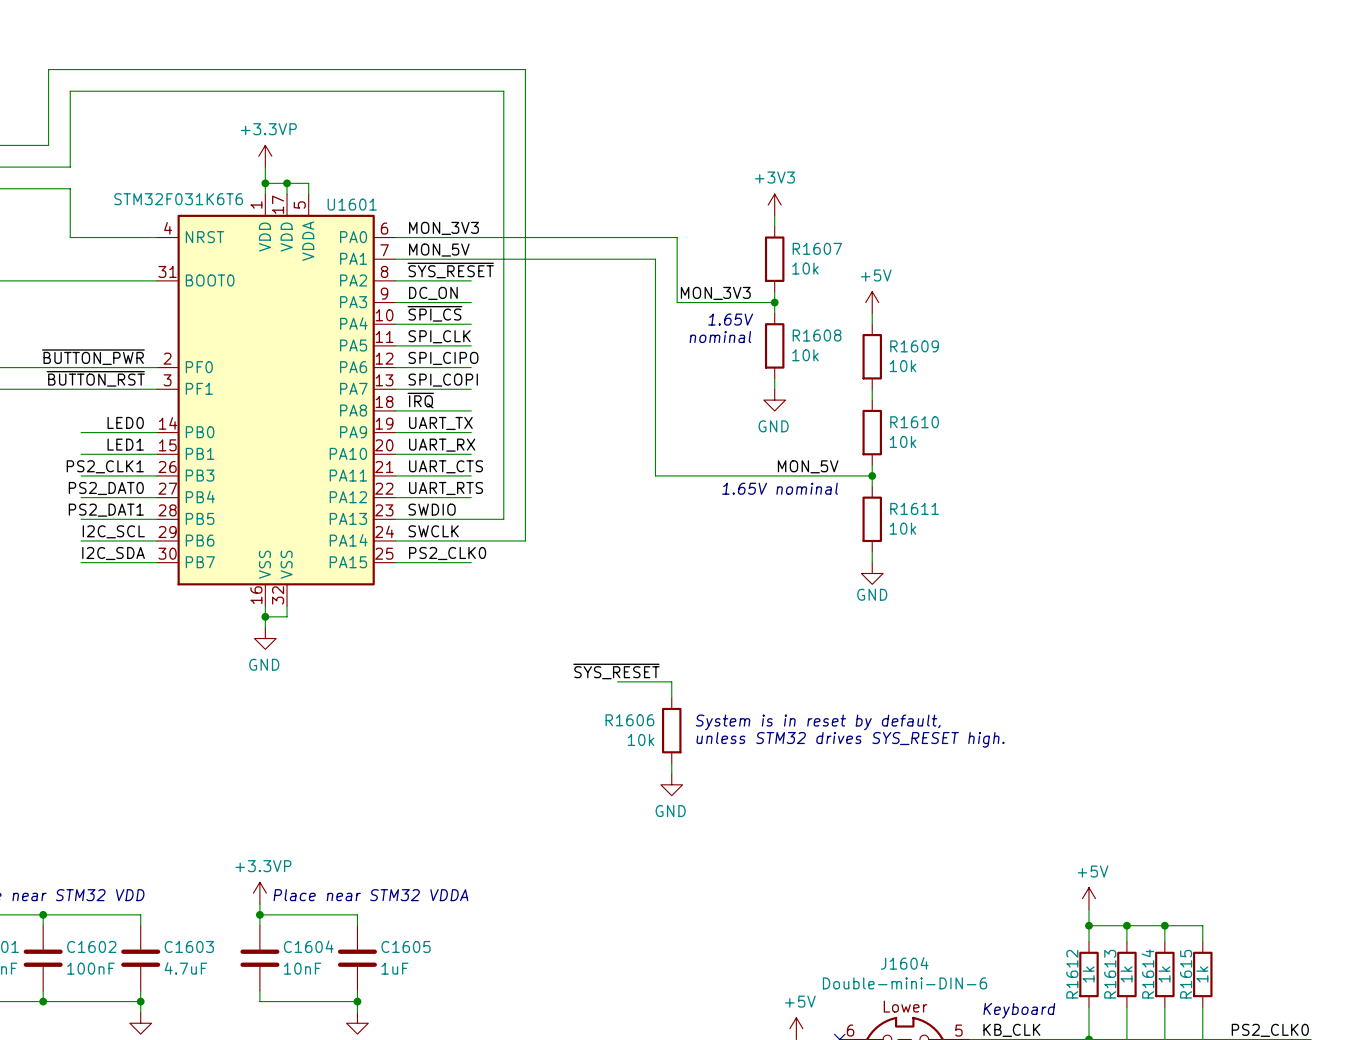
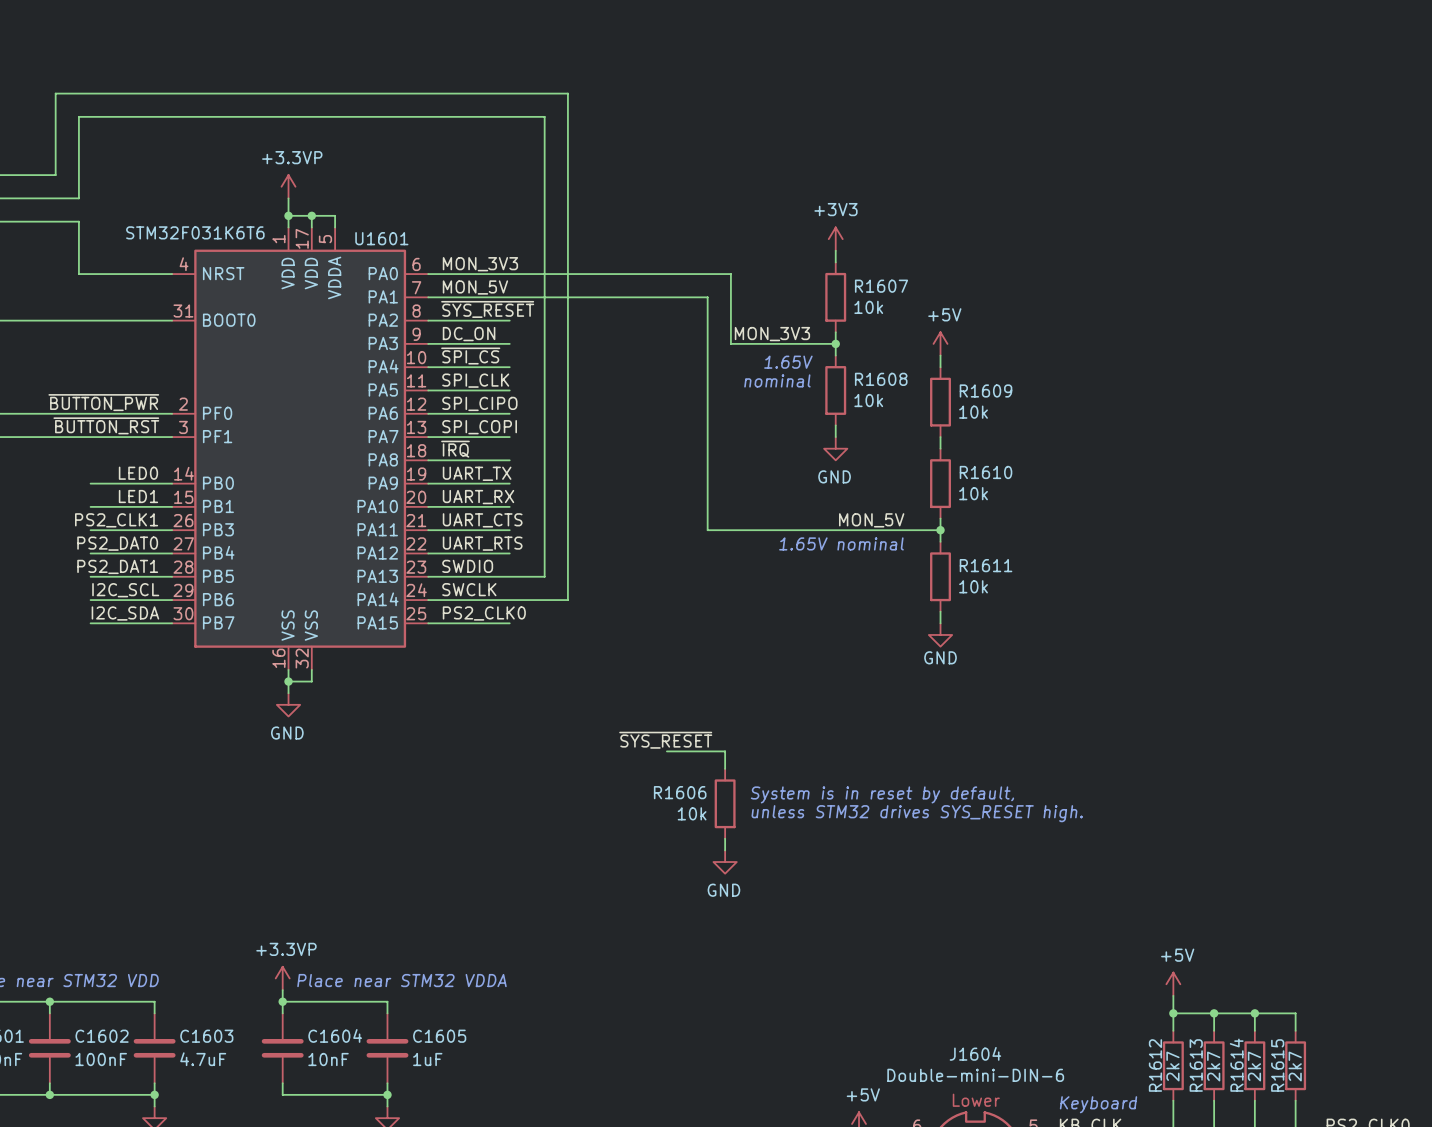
R1612 value: 1k (1088, 974) -> 2k7 (1172, 1066)
R1613 value: 1k (1126, 974) -> 2k7 (1213, 1066)
R1614 value: 1k (1164, 974) -> 2k7 (1254, 1066)
R1615 value: 1k (1202, 974) -> 2k7 (1295, 1066)

